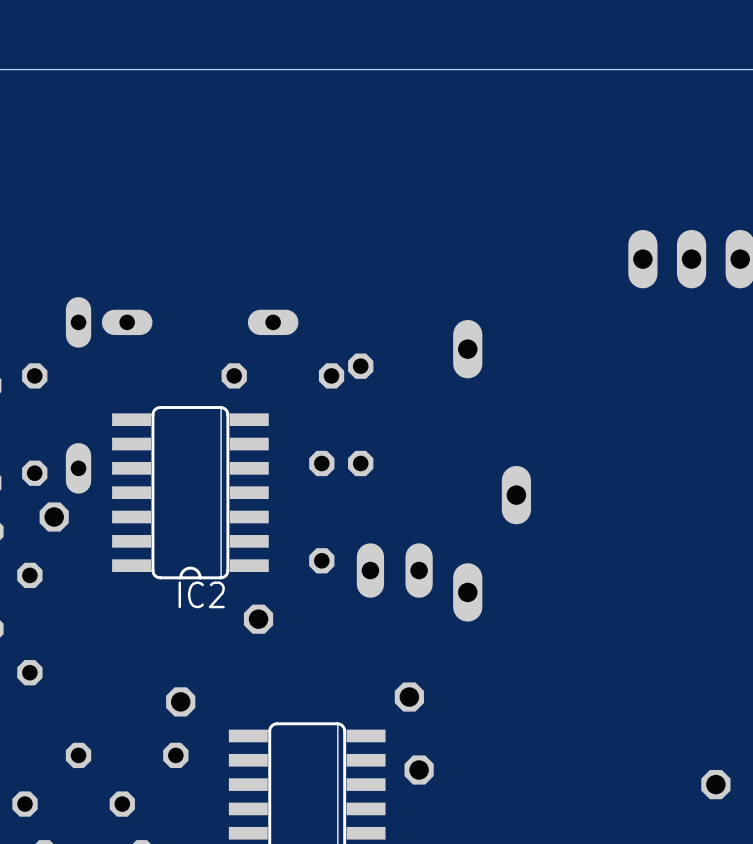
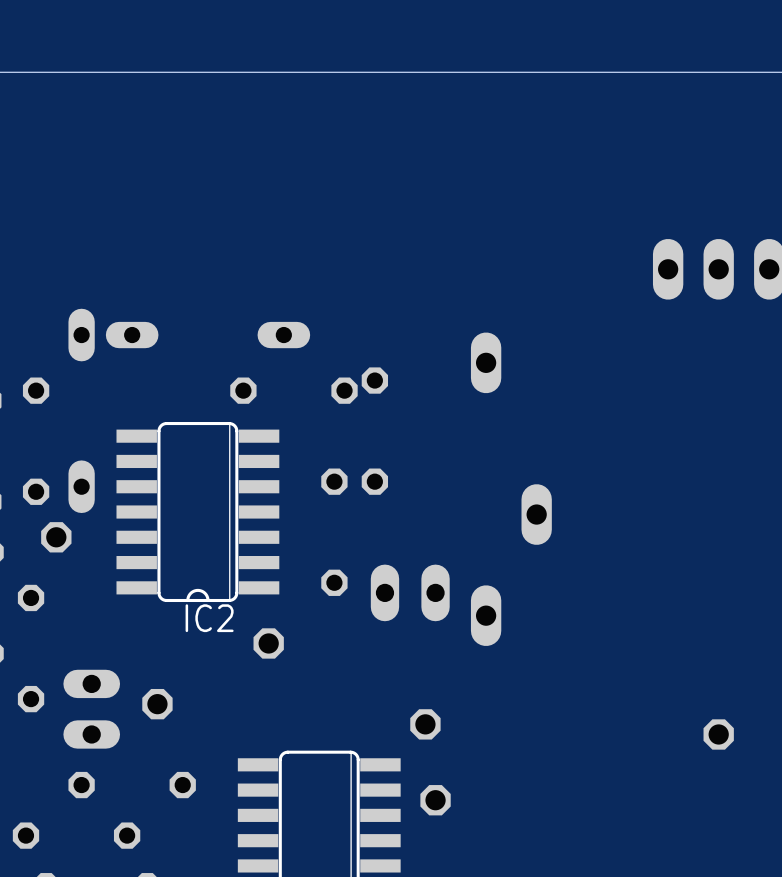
part: none -> (91, 709)
part position: (180, 701) -> (157, 704)
part position: (715, 784) -> (718, 734)

